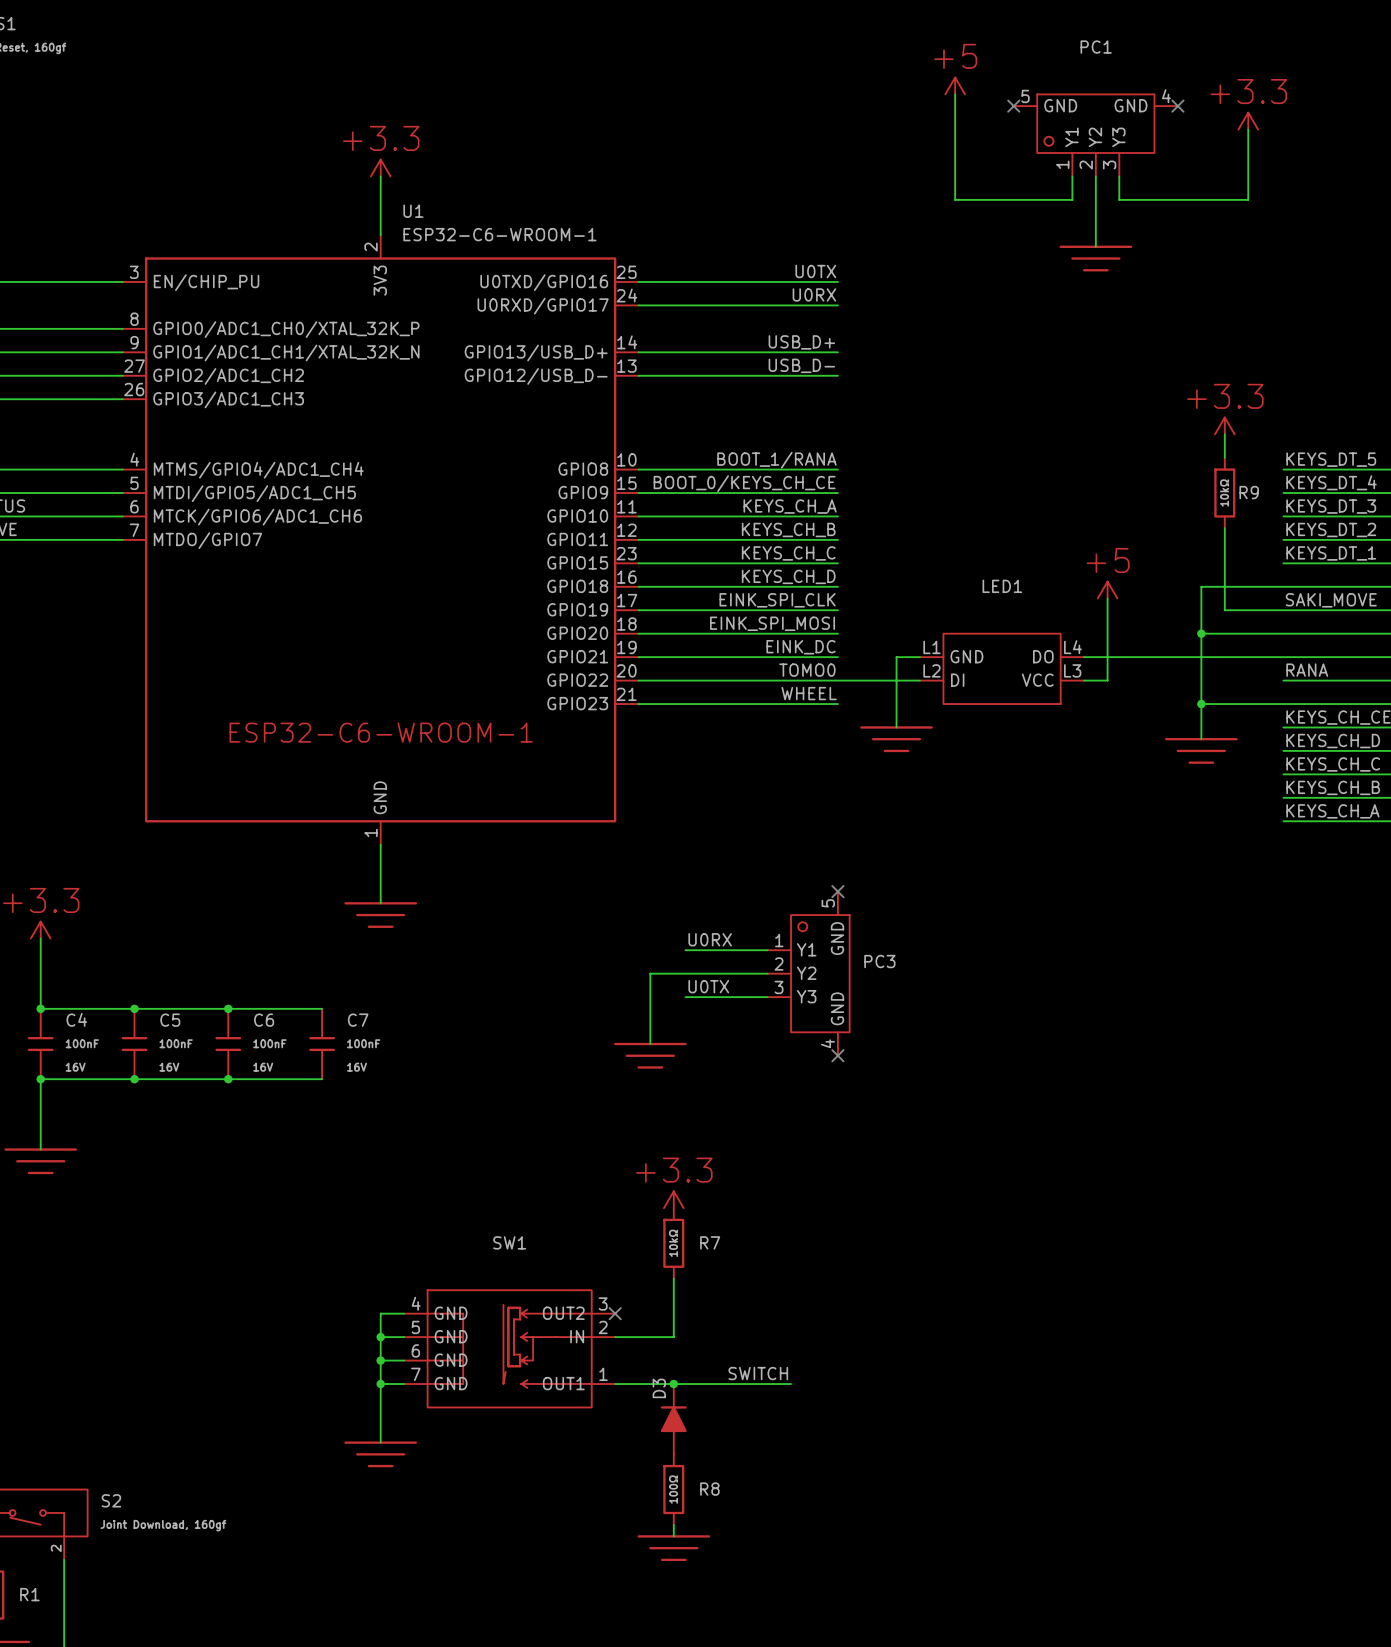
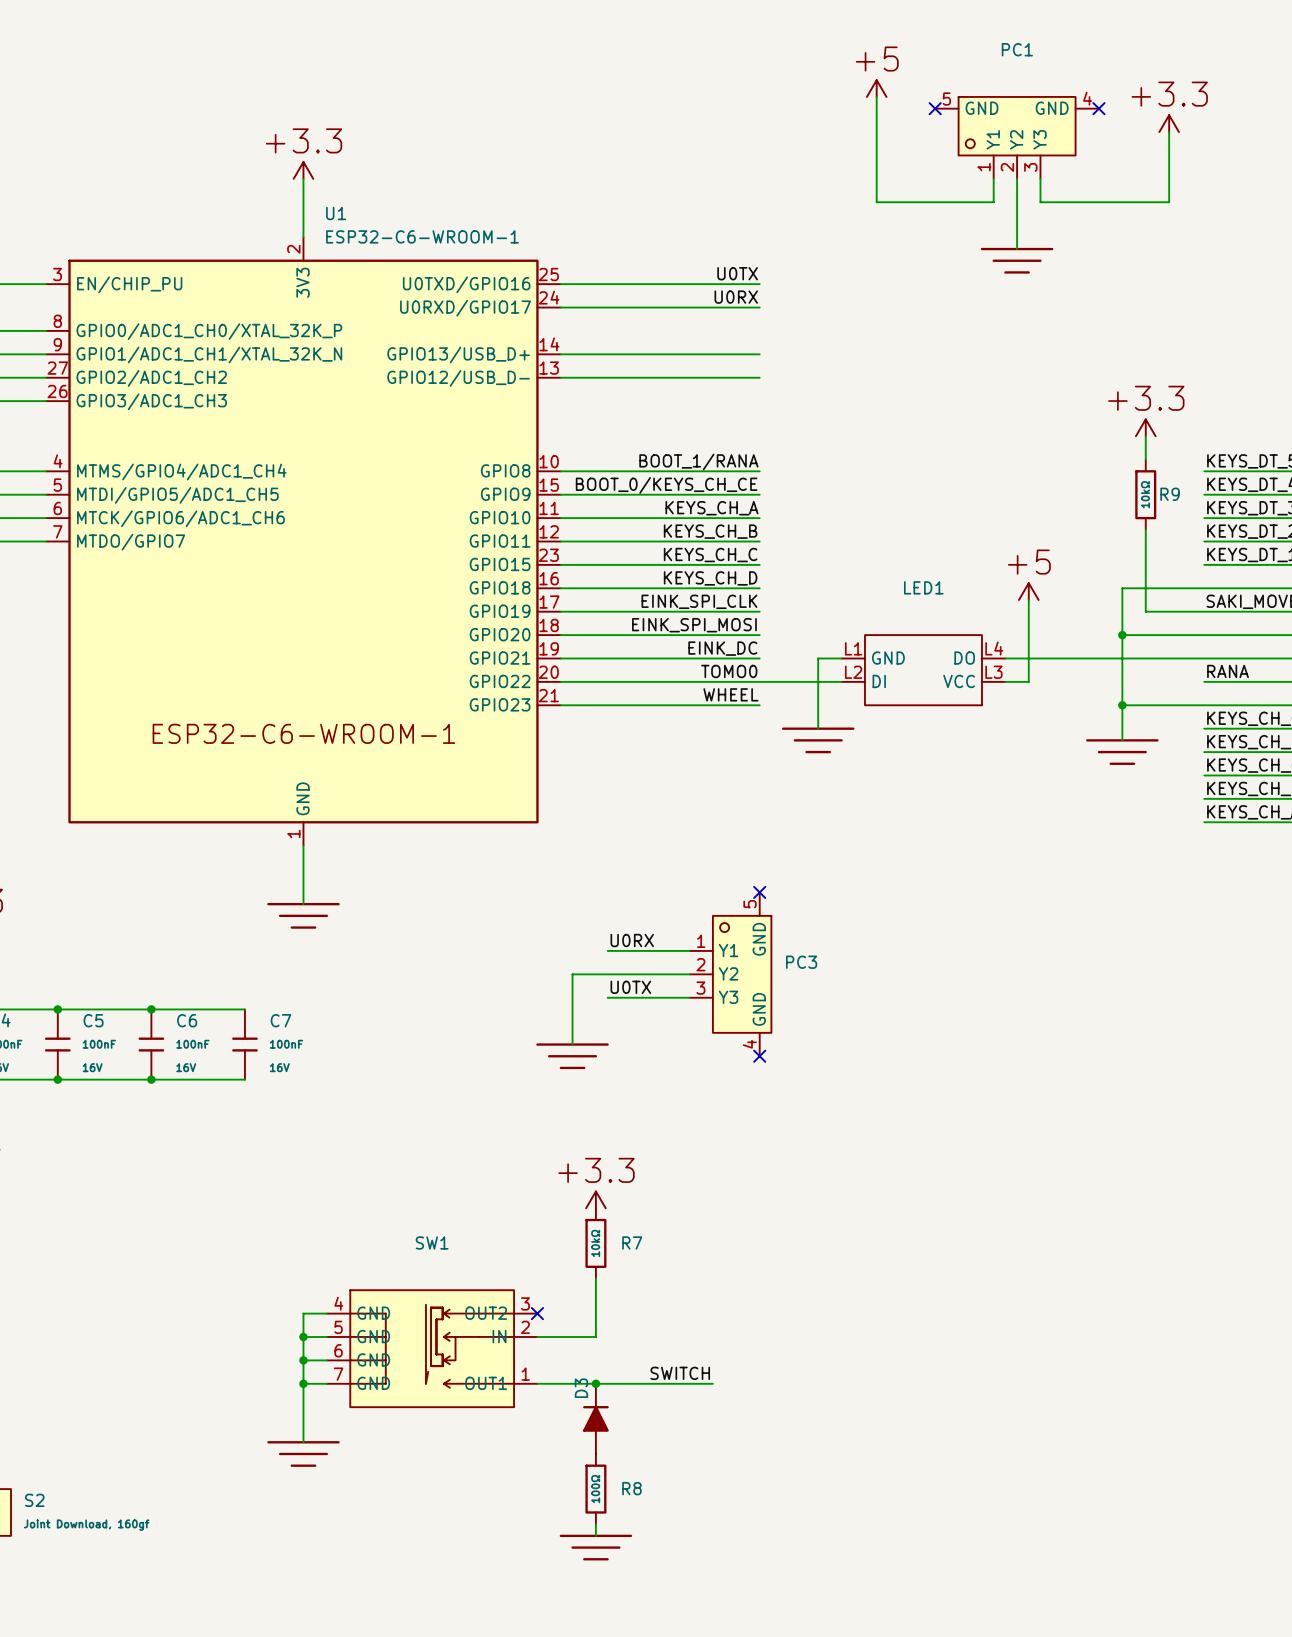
label: USB_D+ (801, 342) -> none
label: USB_D- (801, 365) -> none

